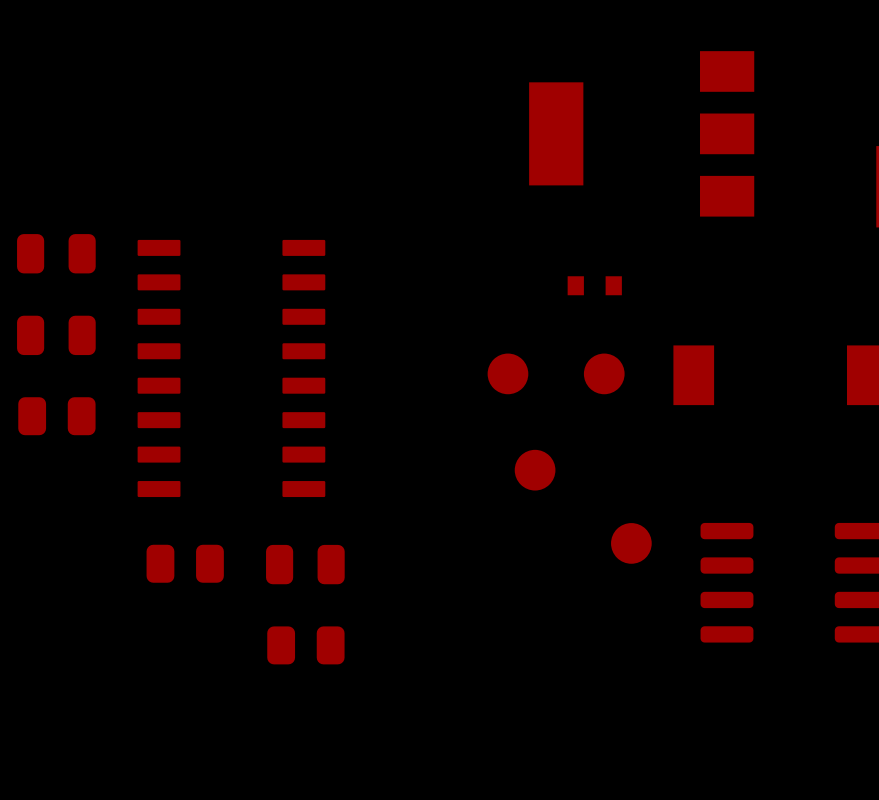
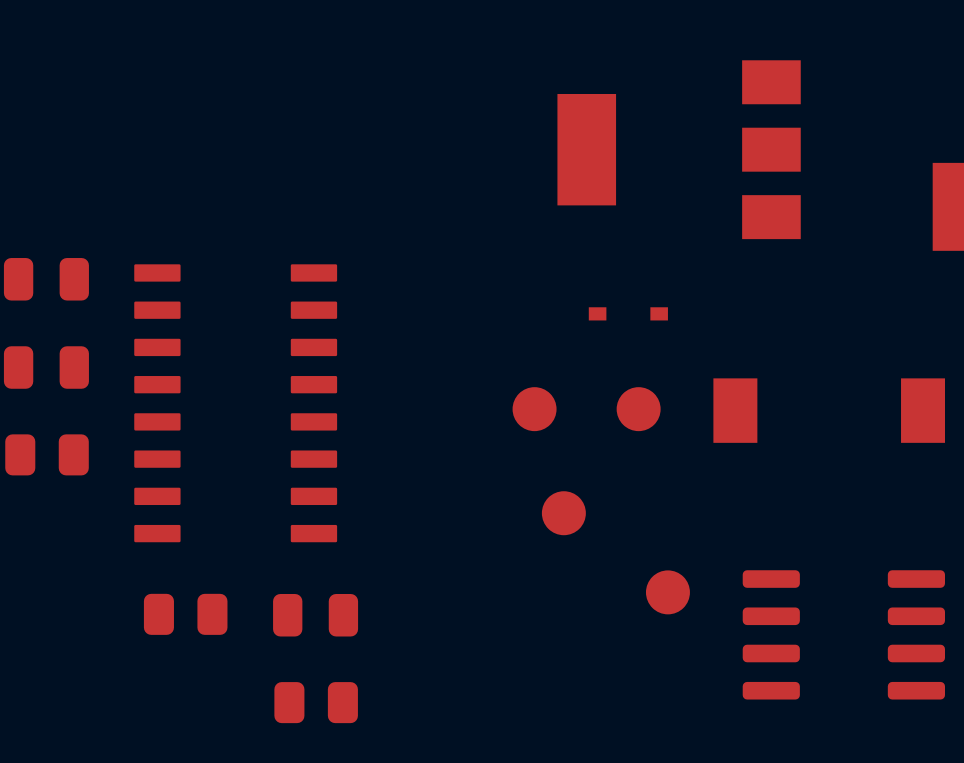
part footprint: [567, 276, 622, 296] -> [588, 307, 668, 321]

